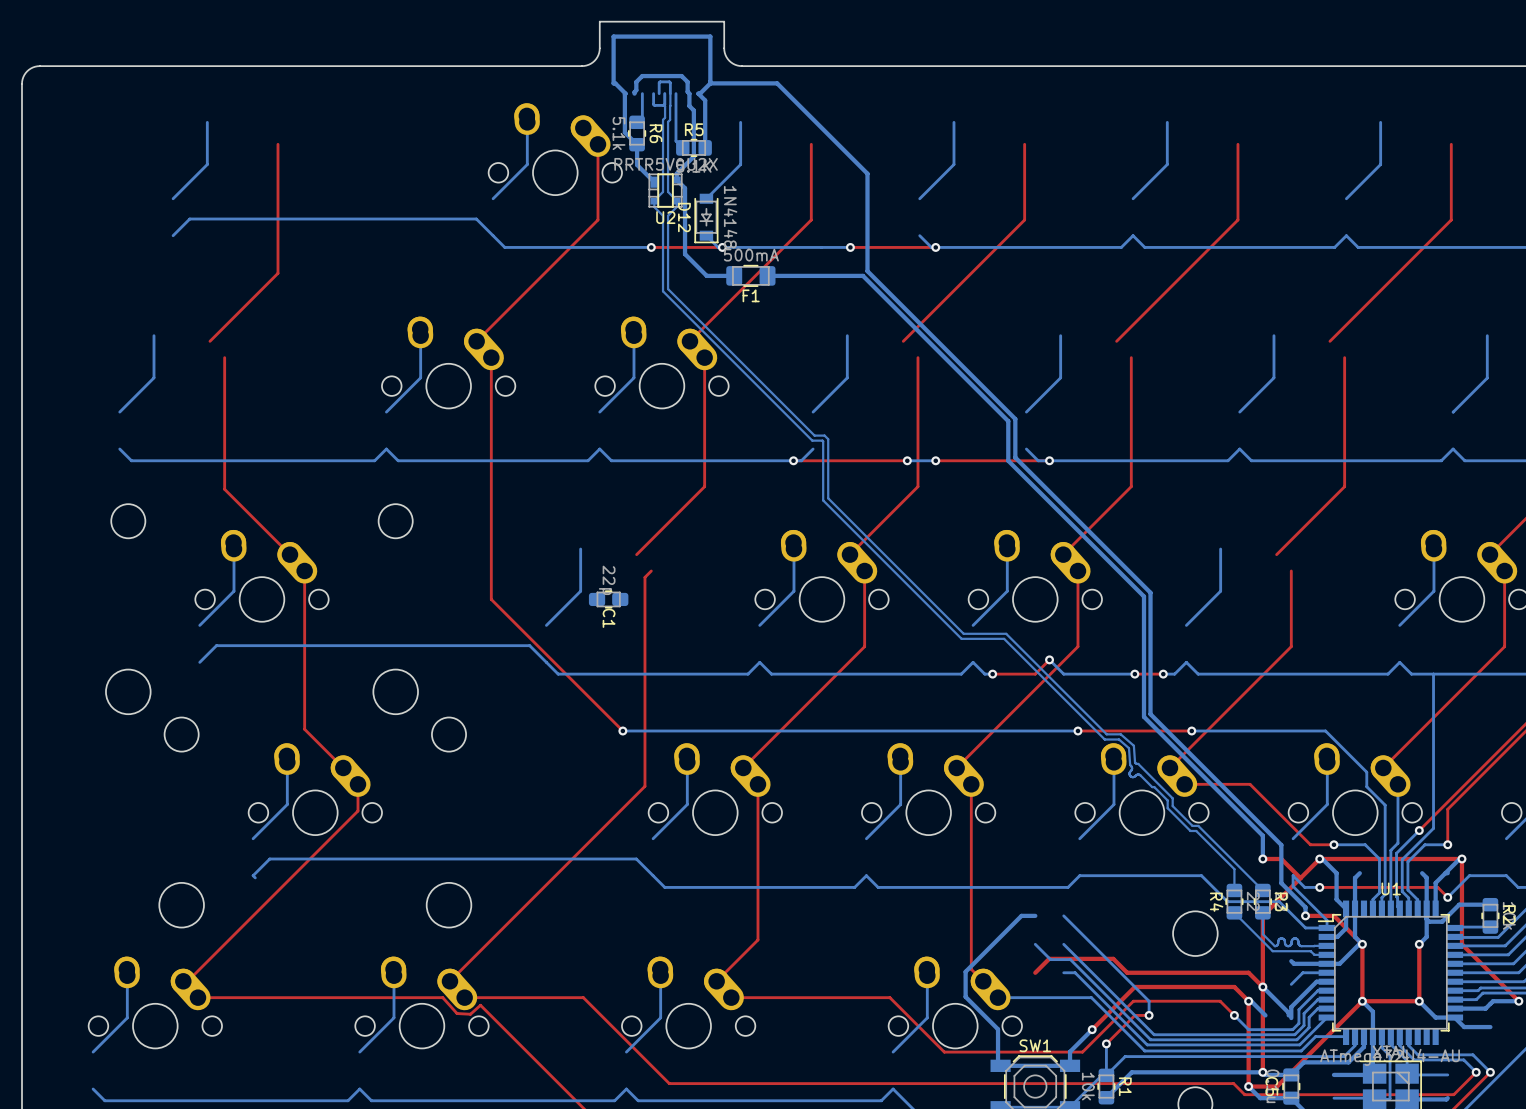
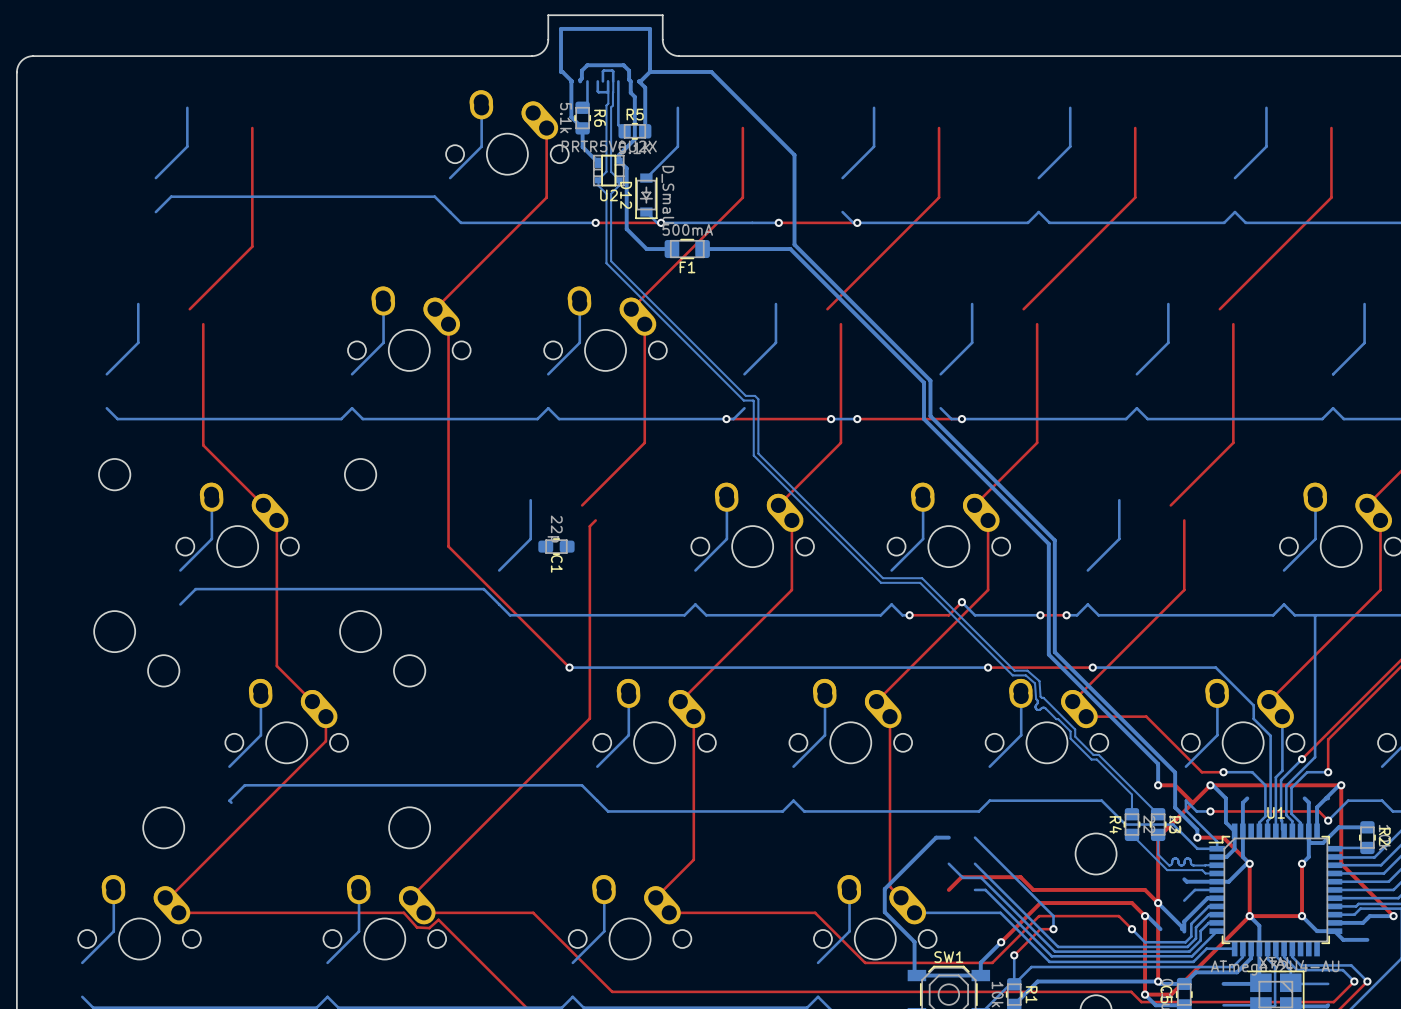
D12 value: 1N4148 (730, 217) -> D_Small (667, 195)

